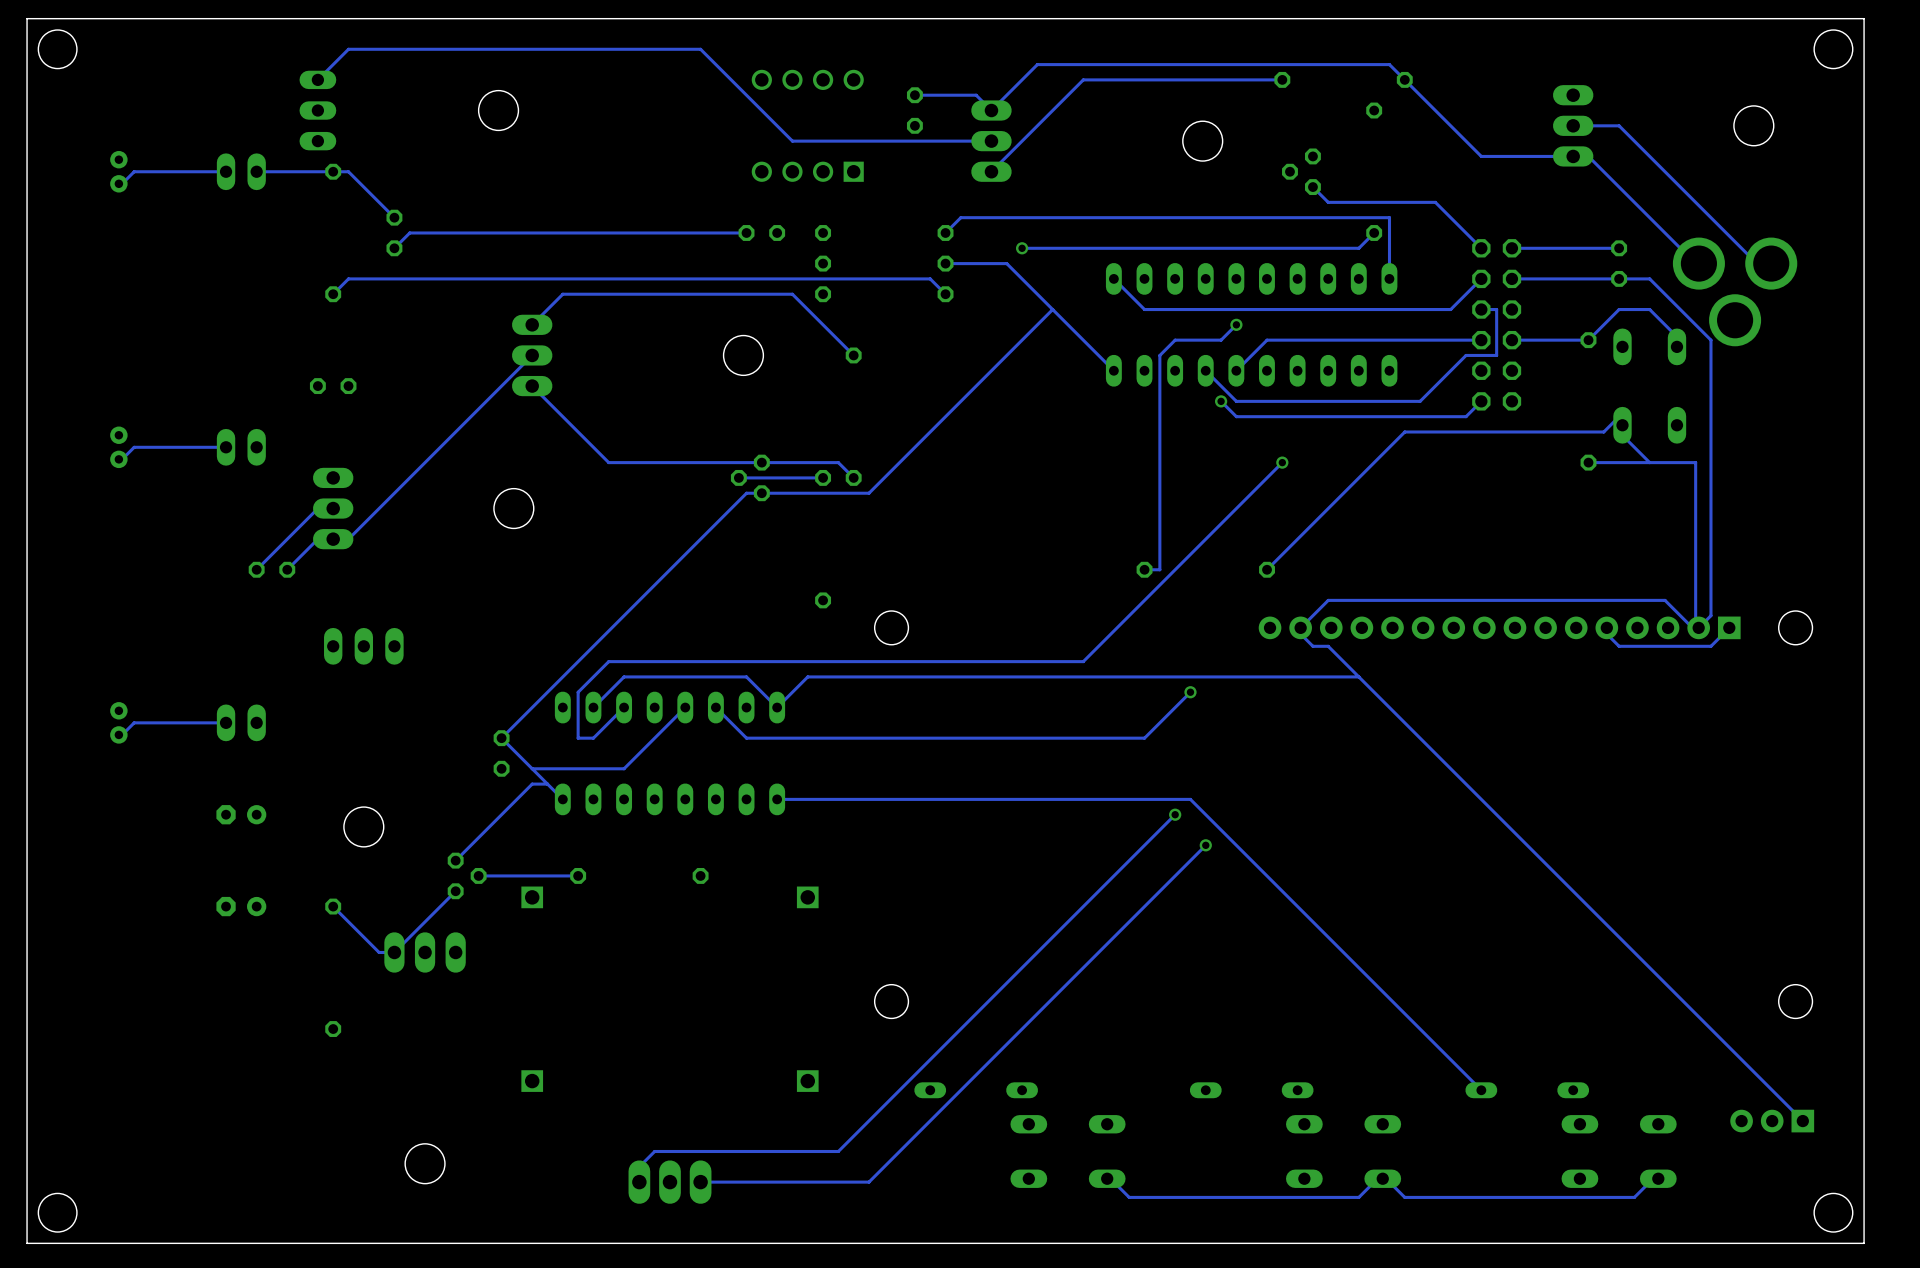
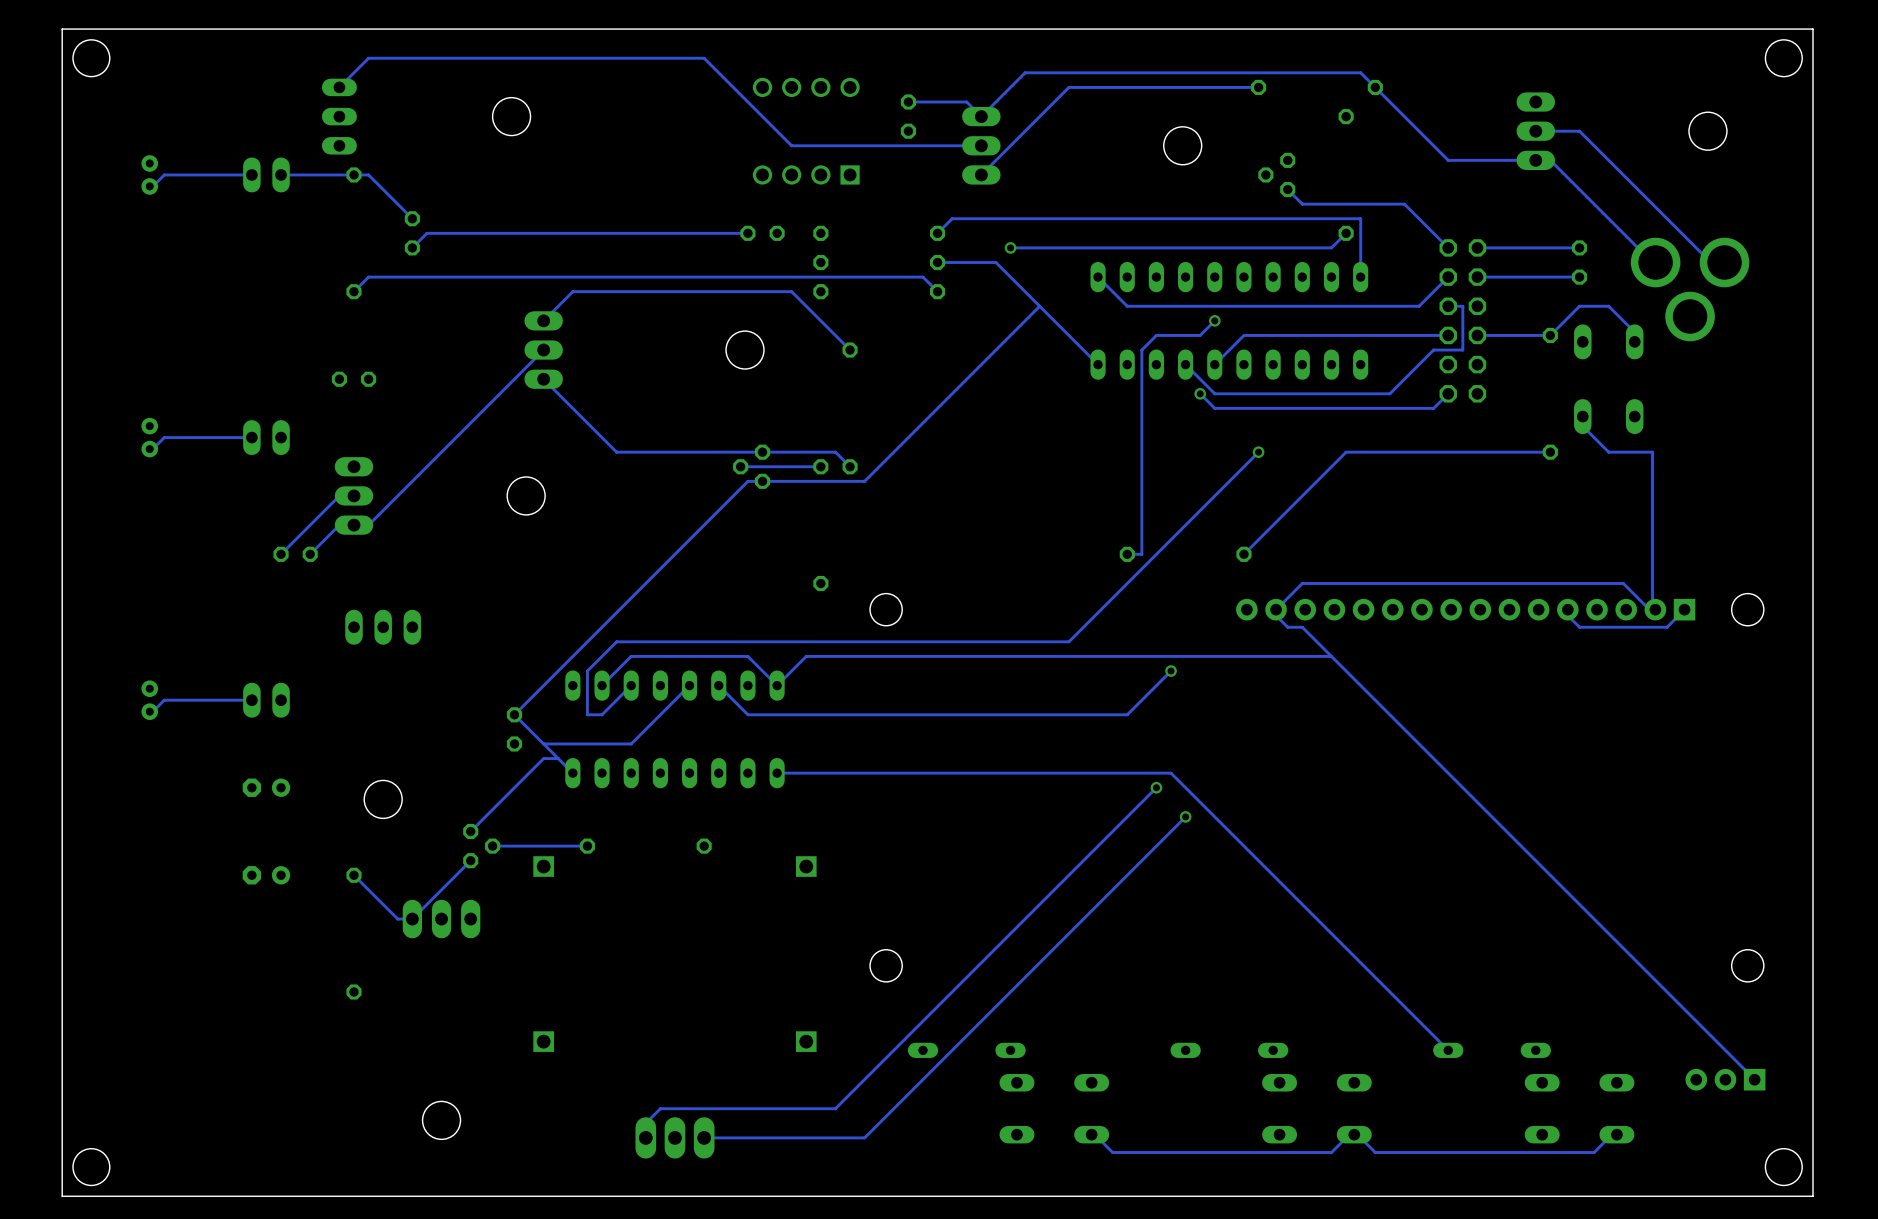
track: (1619, 278) (1649, 278) (1710, 340) (1710, 615) (1695, 631) -> none
track: (1622, 425) (1619, 416) (1603, 431) (1404, 431) (1374, 462) -> (1550, 452) (1346, 452)
track: (1649, 462) (1588, 462) -> none

